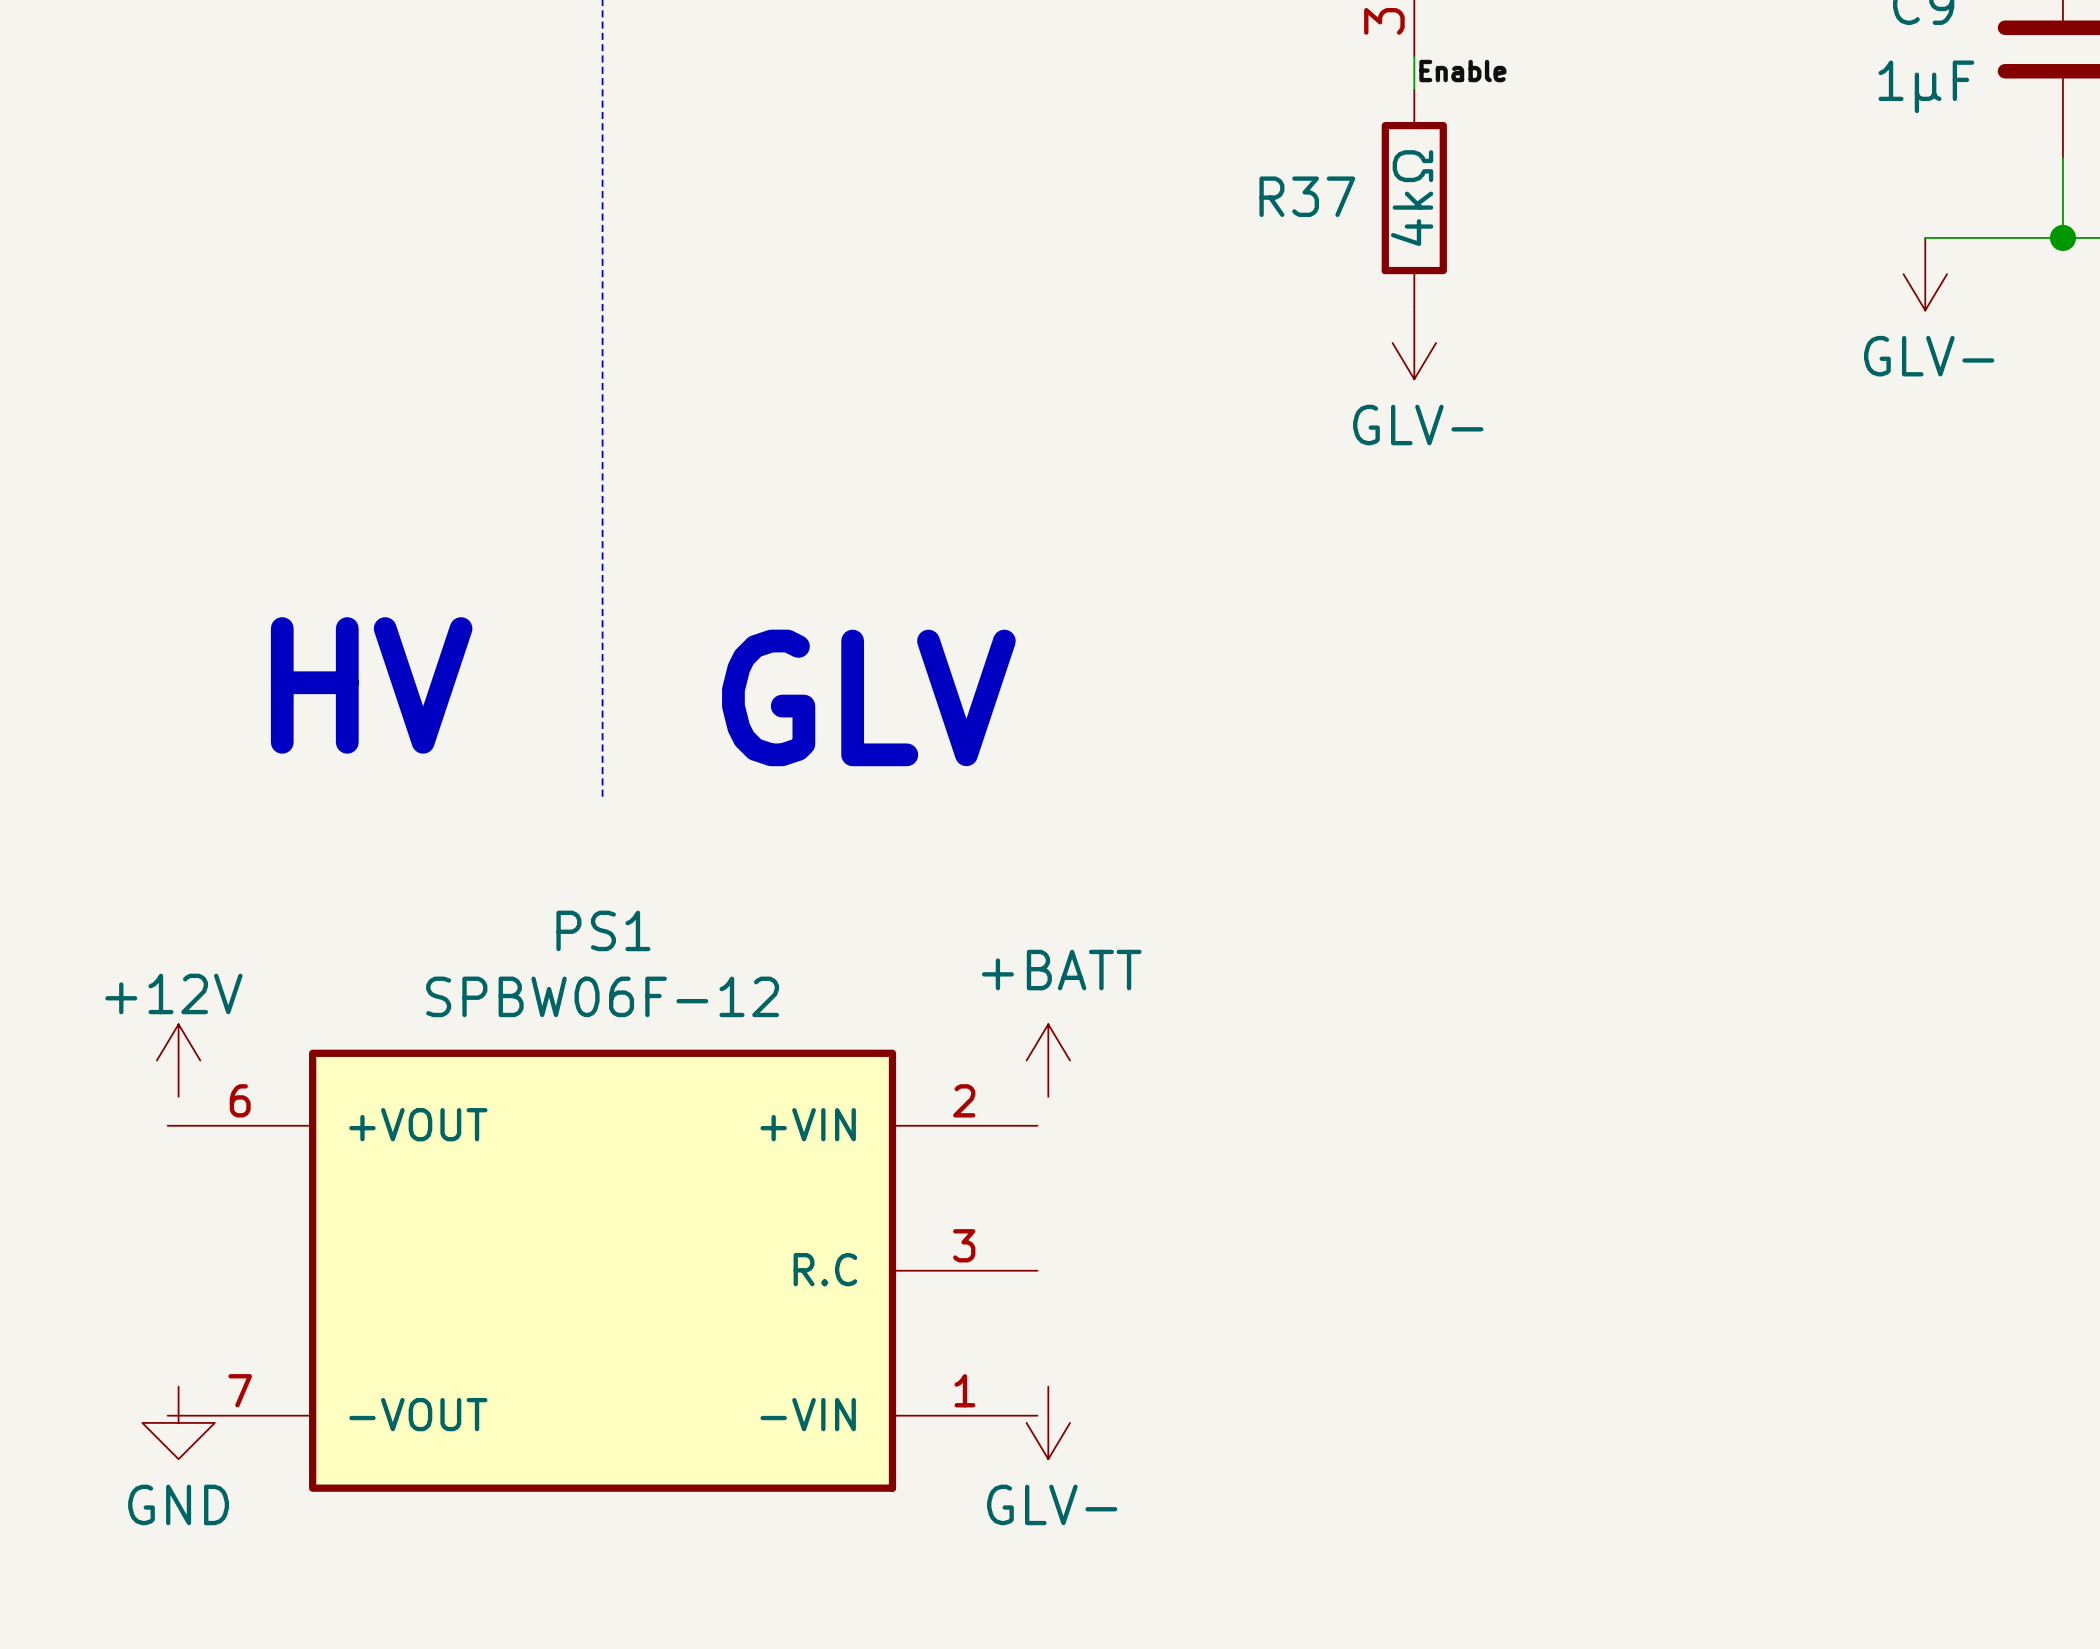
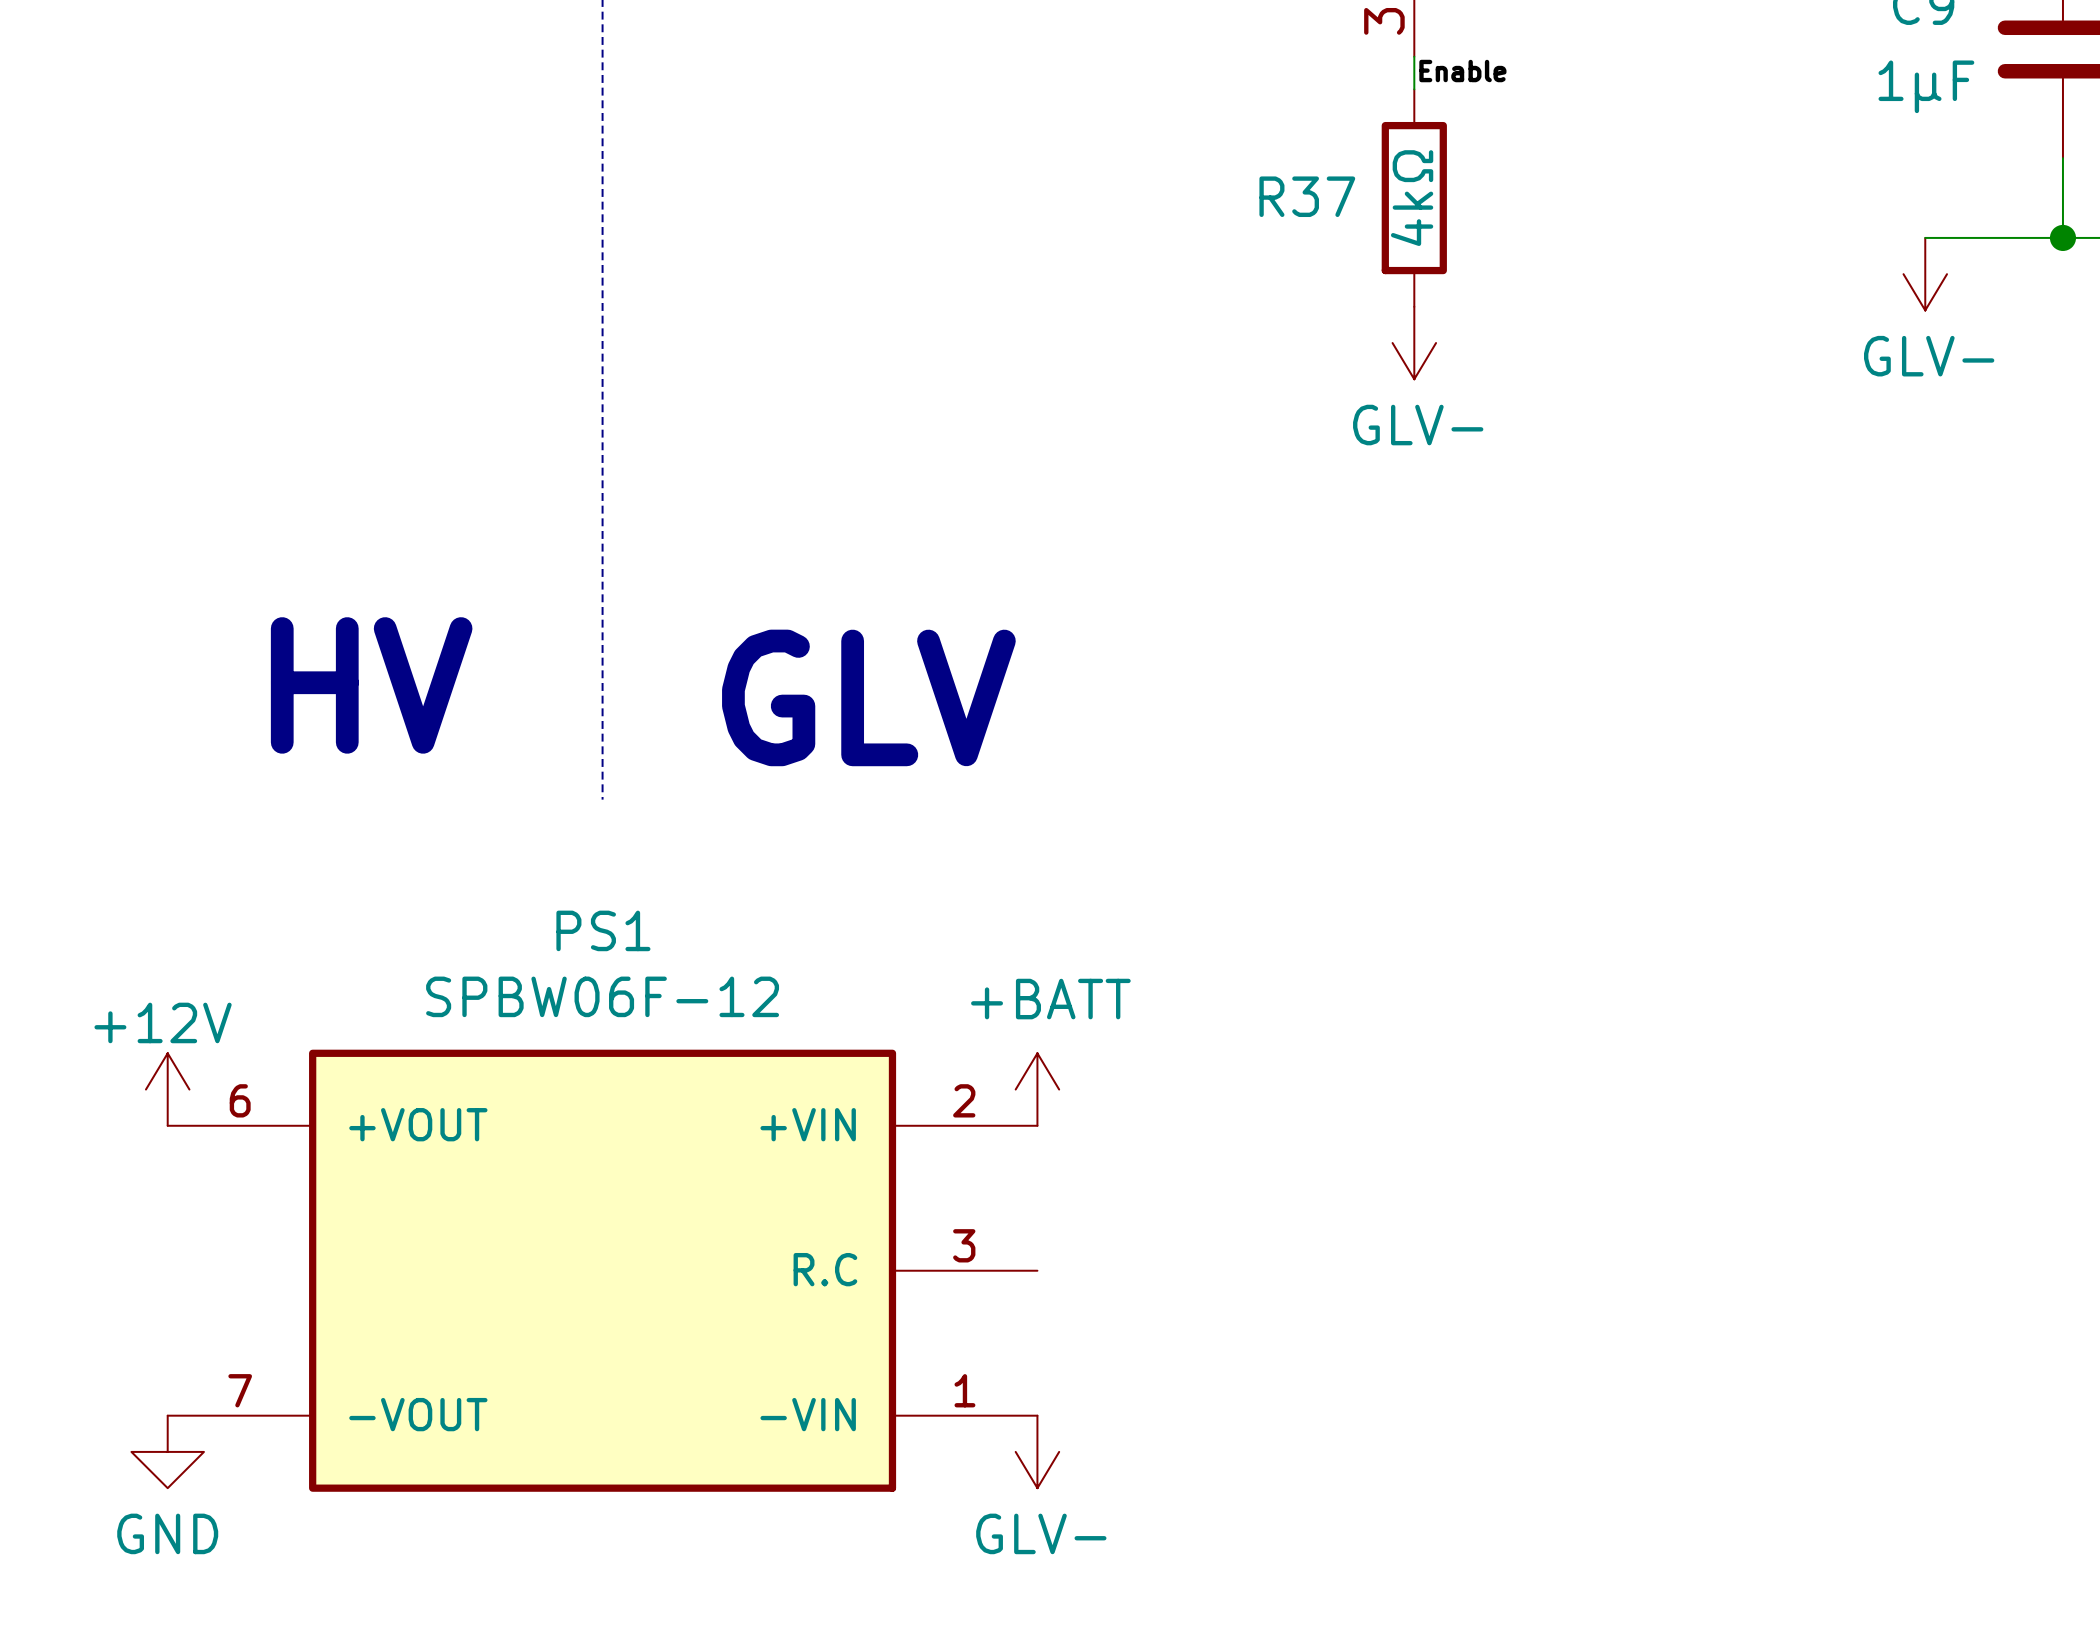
power symbol position: +12V (178, 1060) -> +12V (167, 1089)
power symbol position: +BATT (1048, 1060) -> +BATT (1037, 1089)
power symbol position: GND (178, 1422) -> GND (167, 1451)
power symbol position: GLV- (1048, 1422) -> GLV- (1037, 1451)

